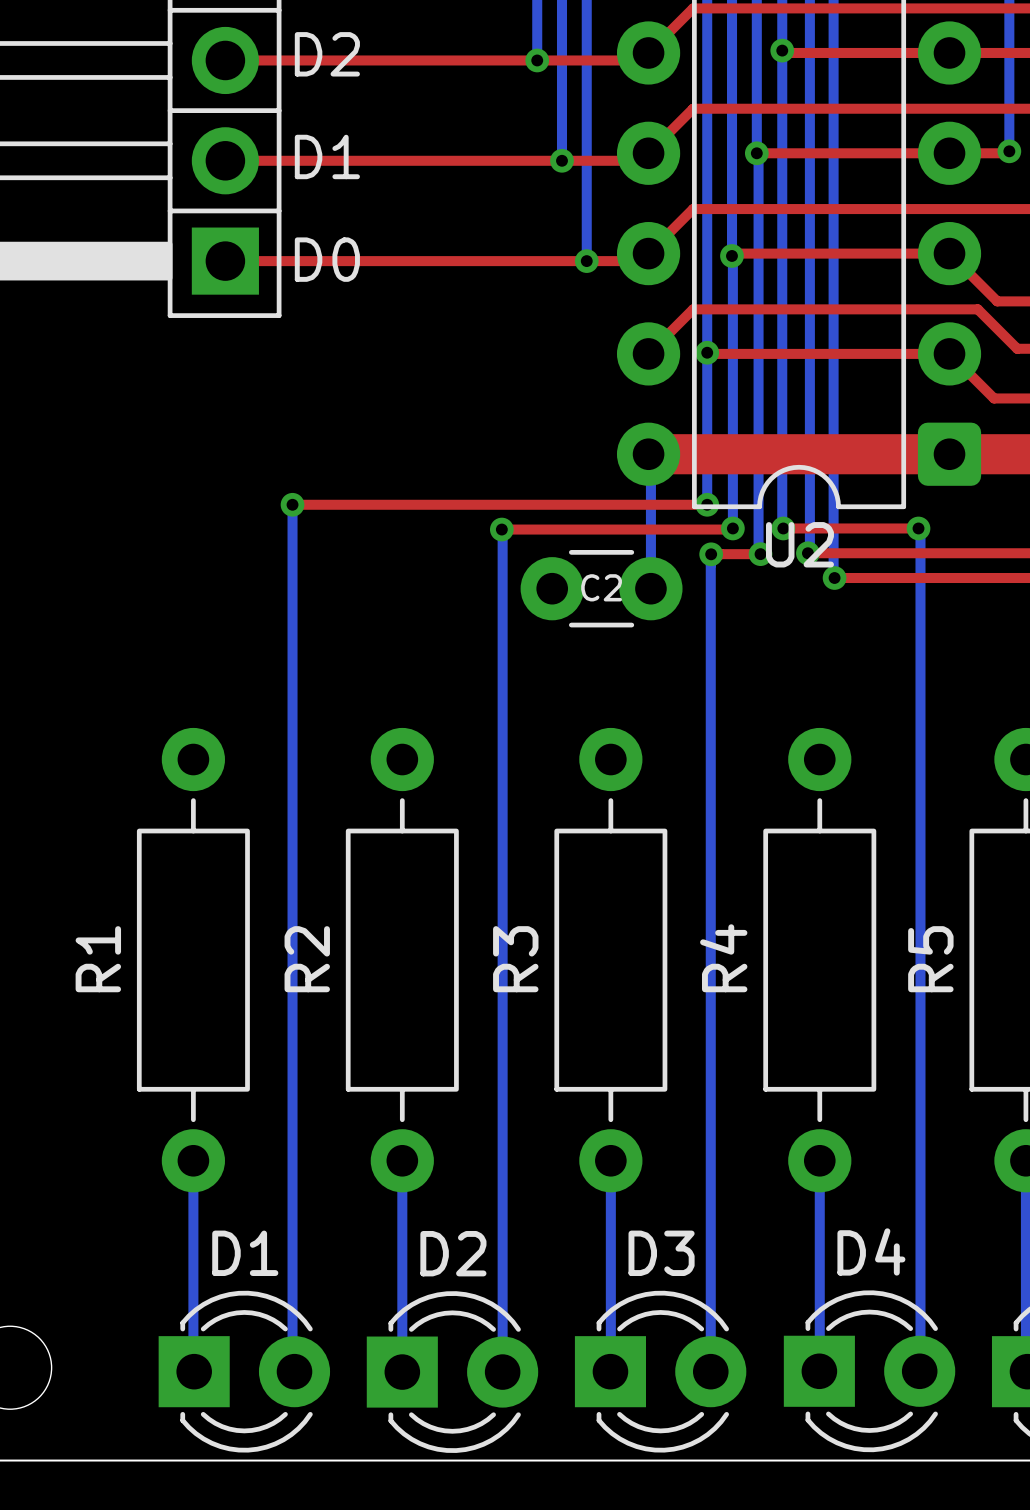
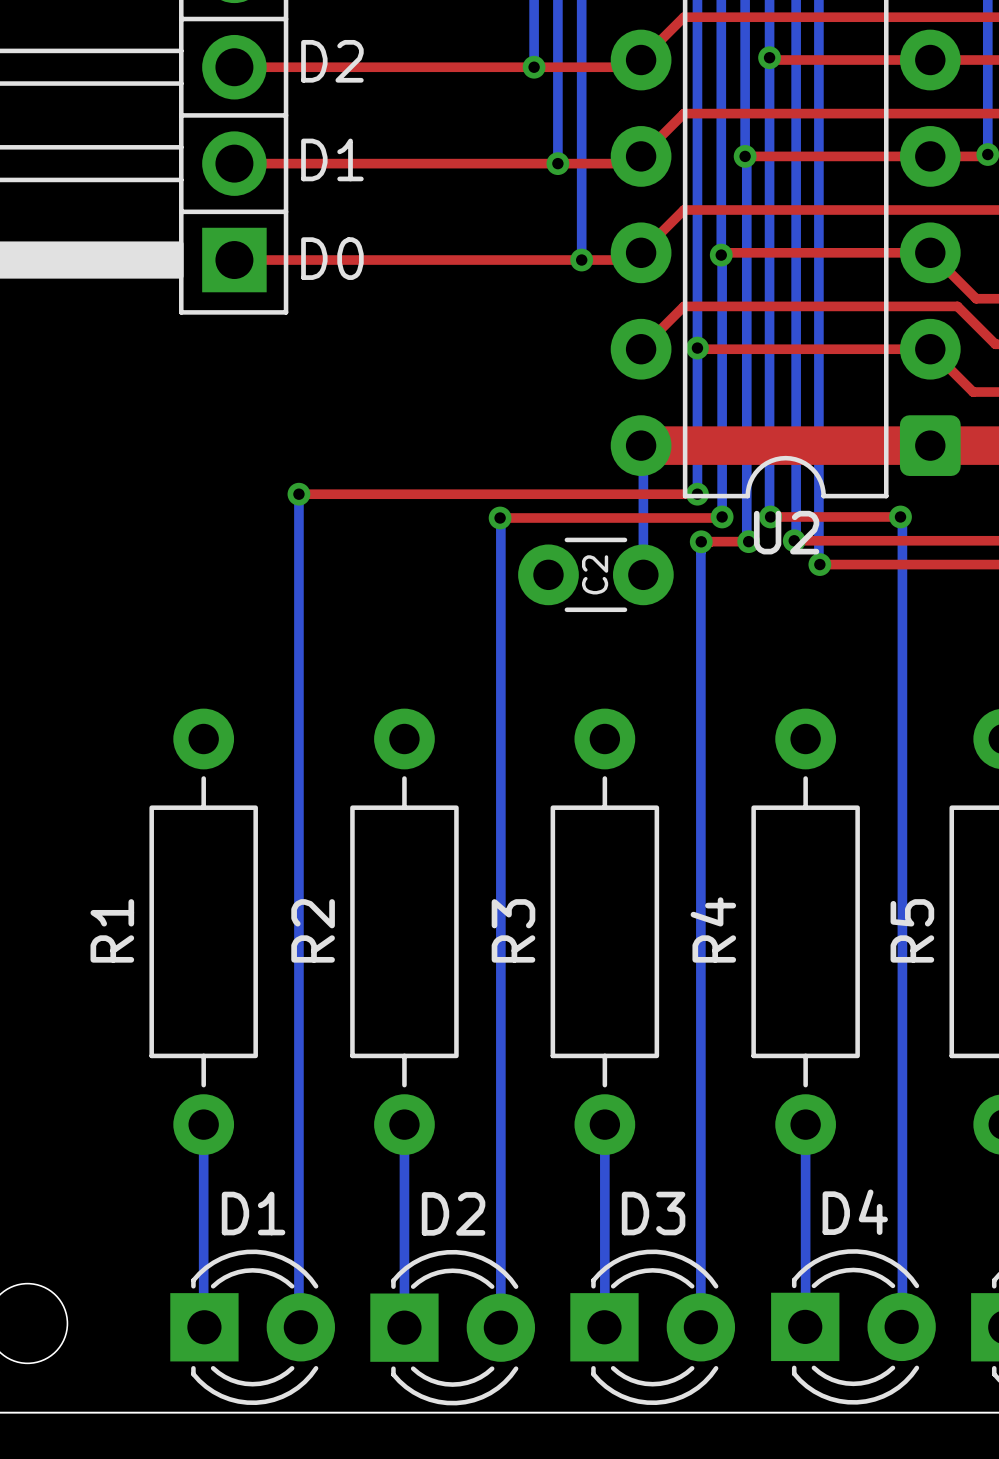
C2 name rotation: 0° (601, 587) -> 90° counterclockwise (595, 574)

